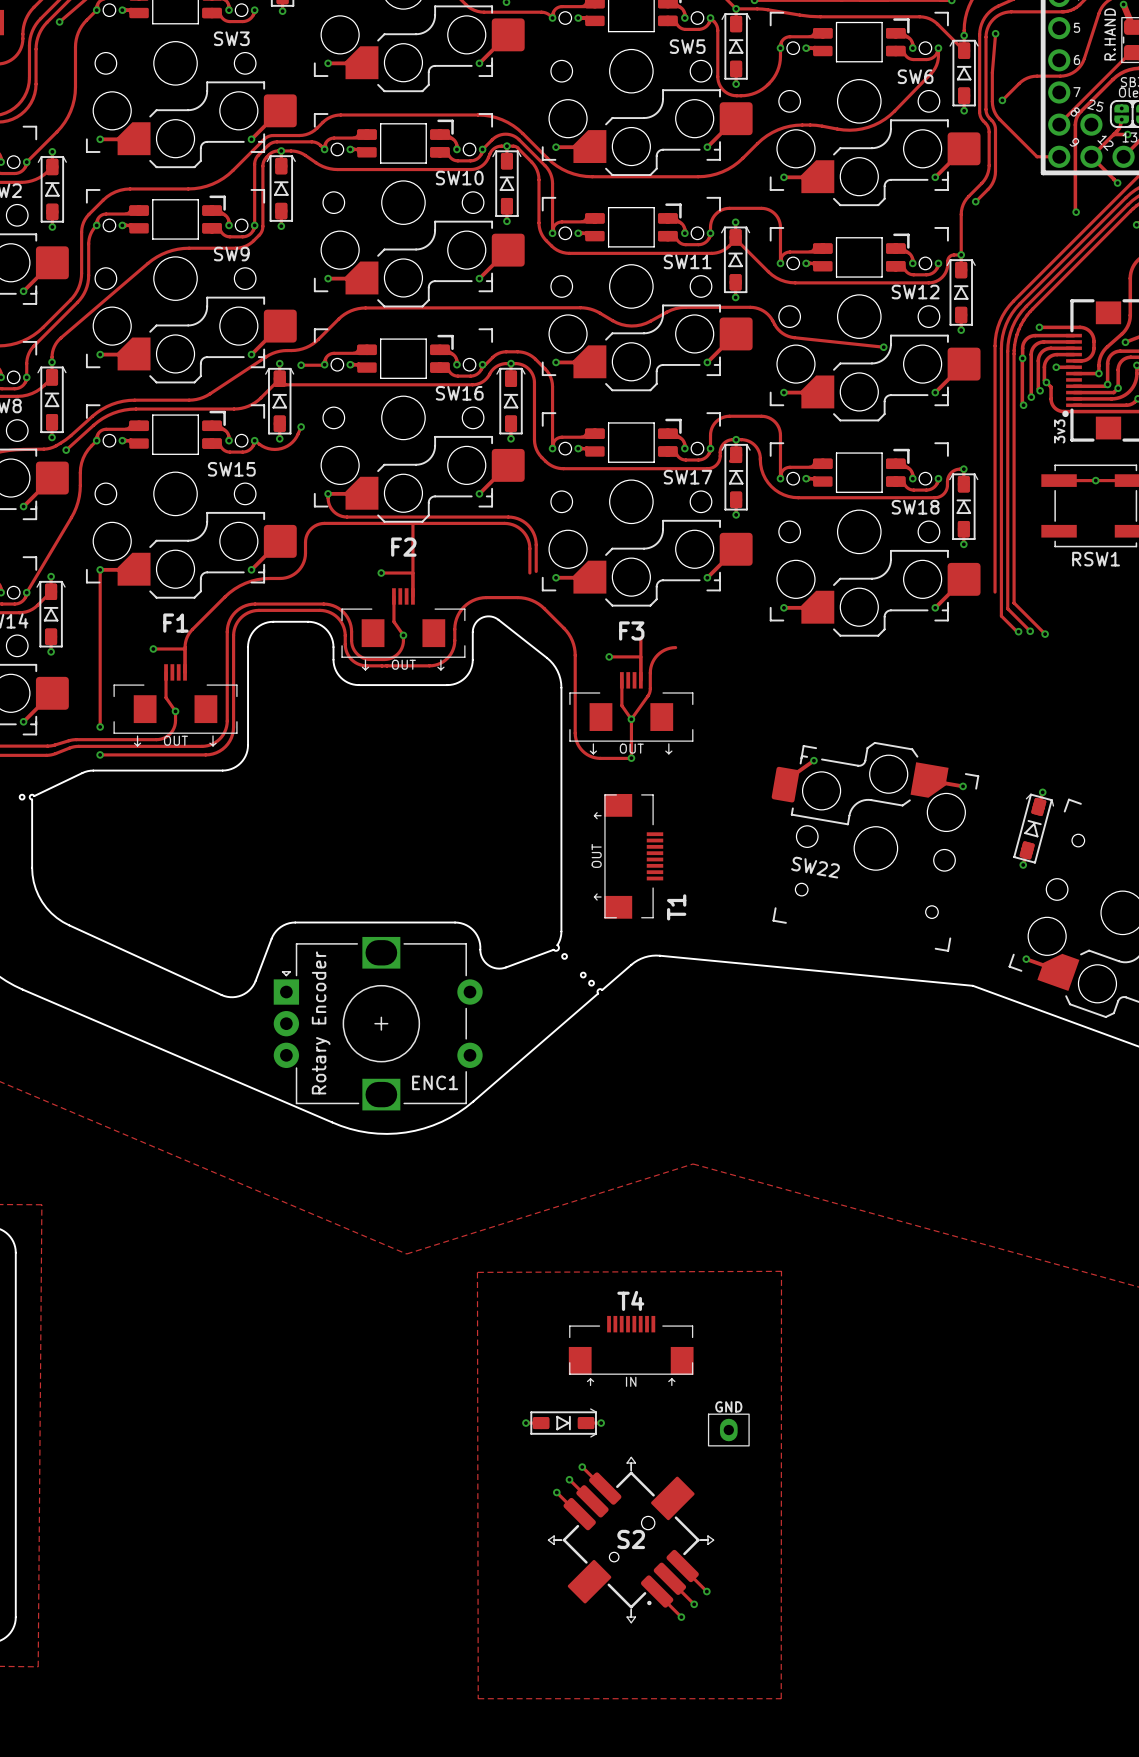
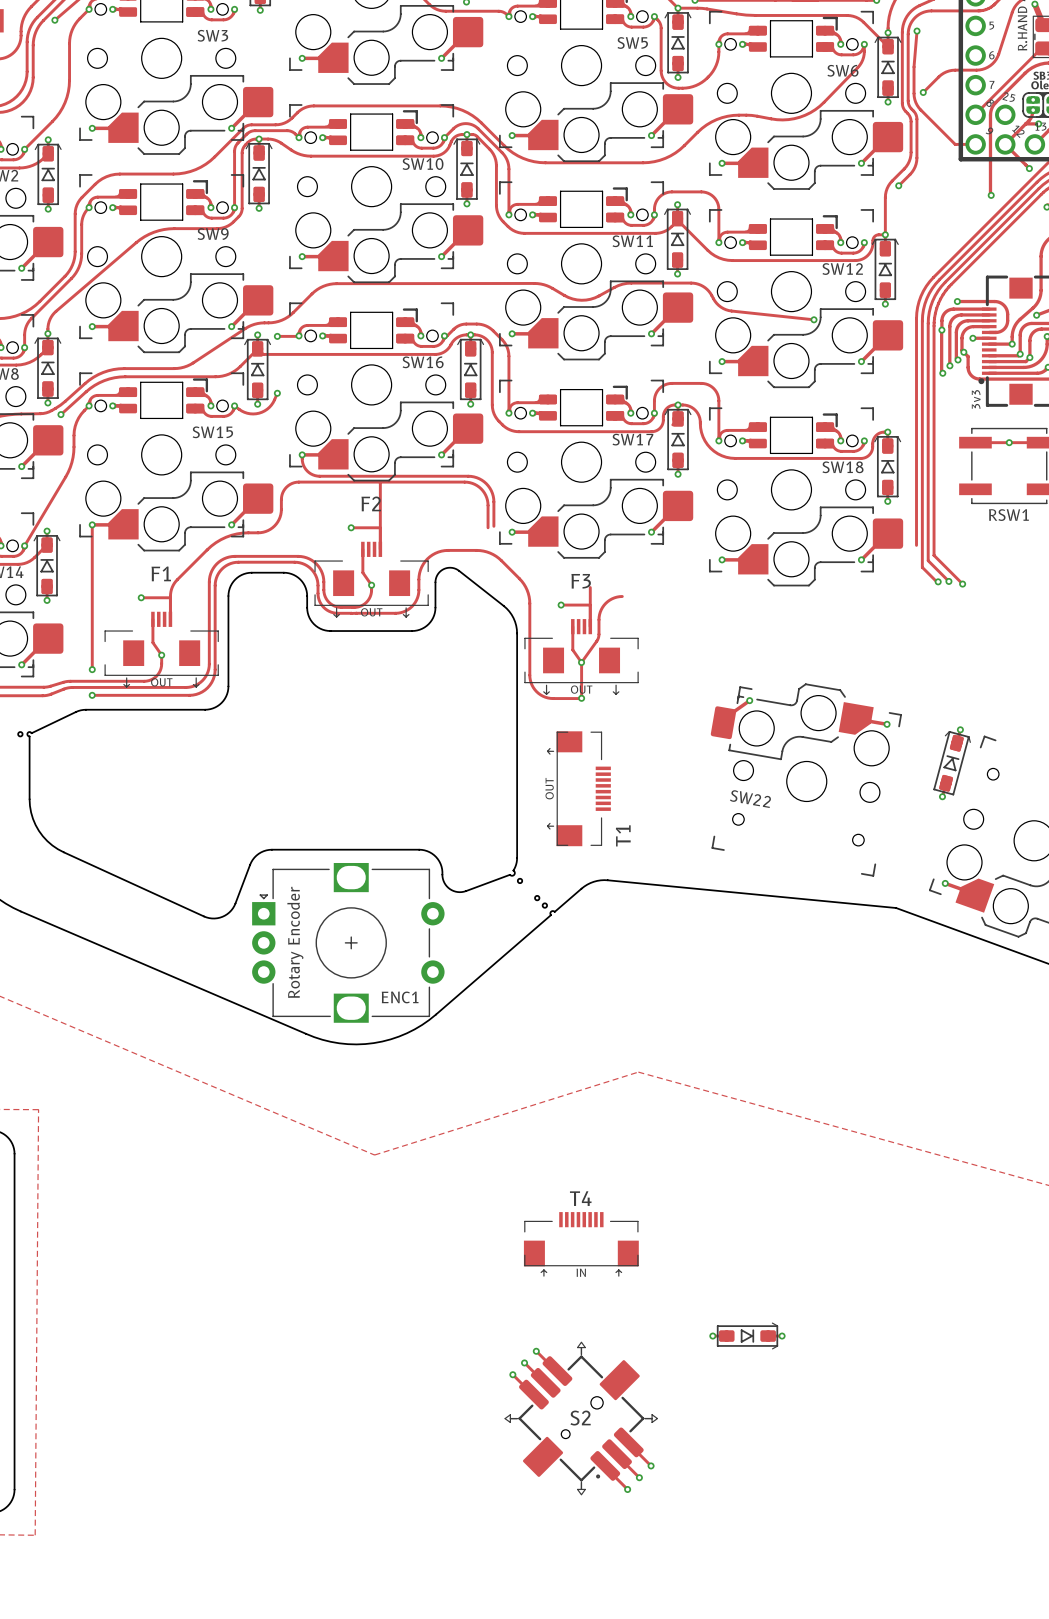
zone outline: (781, 1271) (781, 1698) (478, 1698) (477, 1272) (781, 1271) -> none
part position: (563, 1422) -> (747, 1335)
part: (728, 1430) -> none

